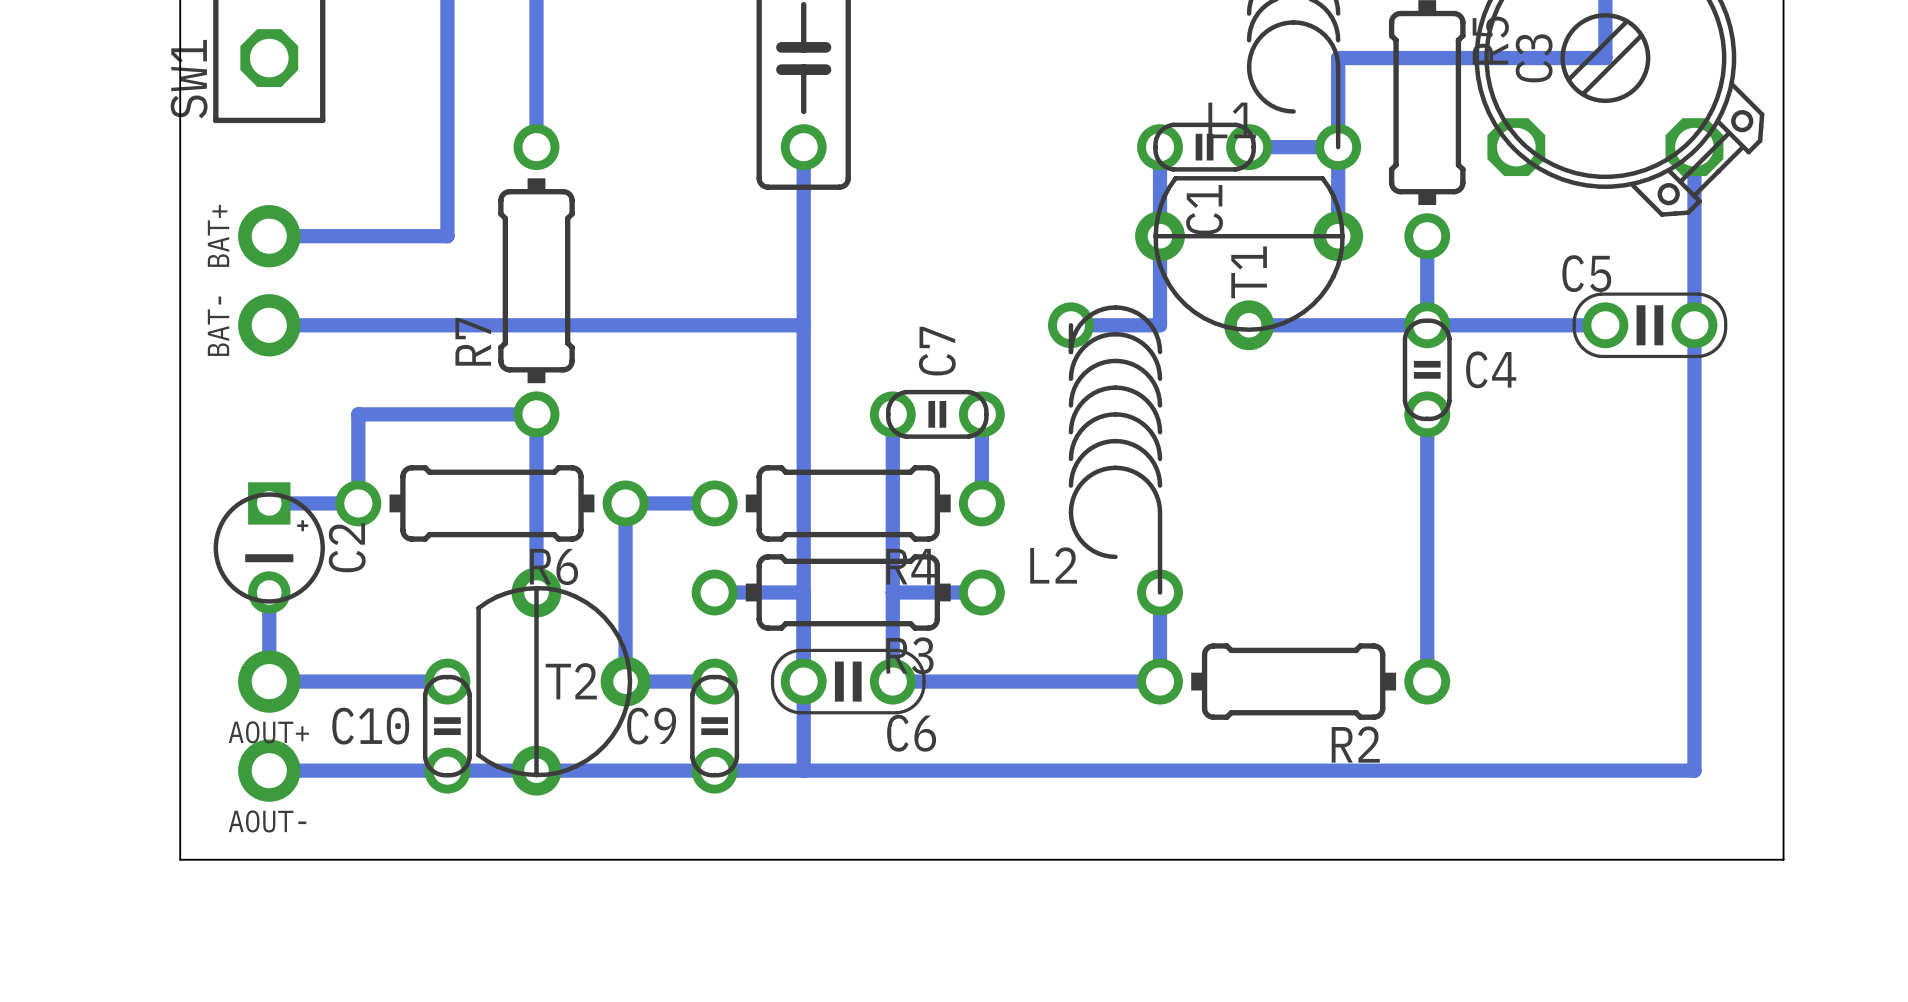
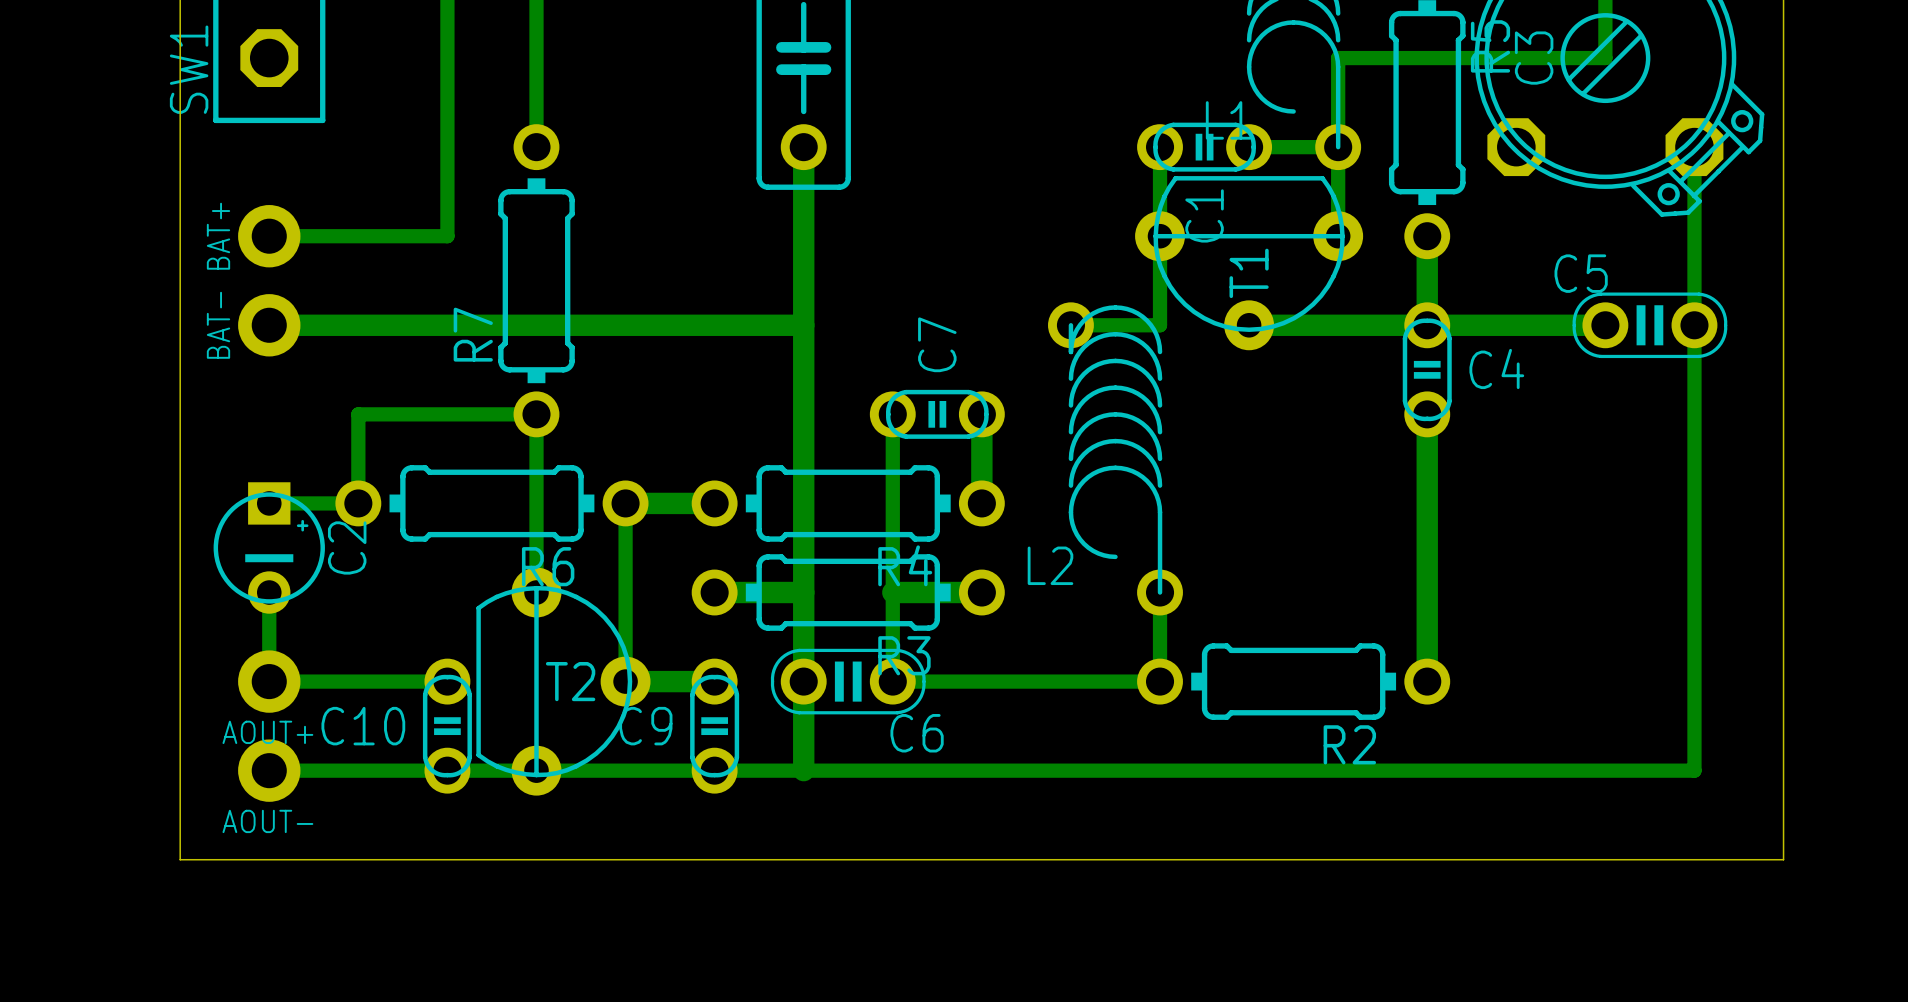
bottom track width: thin (803, 147) (803, 770) -> thick (803, 147) (803, 770)
bottom track width: thin (1427, 236) (1427, 325) -> thick (1427, 236) (1427, 325)
bottom track width: thin (269, 325) (803, 325) -> thick (269, 325) (803, 325)
bottom track width: thin (1249, 325) (1605, 325) -> thick (1249, 325) (1605, 325)
bottom track width: thin (981, 414) (981, 503) -> thick (981, 414) (981, 503)
bottom track width: thin (1427, 414) (1427, 681) -> thick (1427, 414) (1427, 681)
bottom track width: thin (625, 503) (714, 503) -> thick (625, 503) (714, 503)
bottom track width: thin (714, 592) (803, 592) -> thick (714, 592) (803, 592)
bottom track width: thin (892, 592) (981, 592) -> thick (892, 592) (981, 592)
bottom track width: thin (625, 681) (714, 681) -> thick (625, 681) (714, 681)

